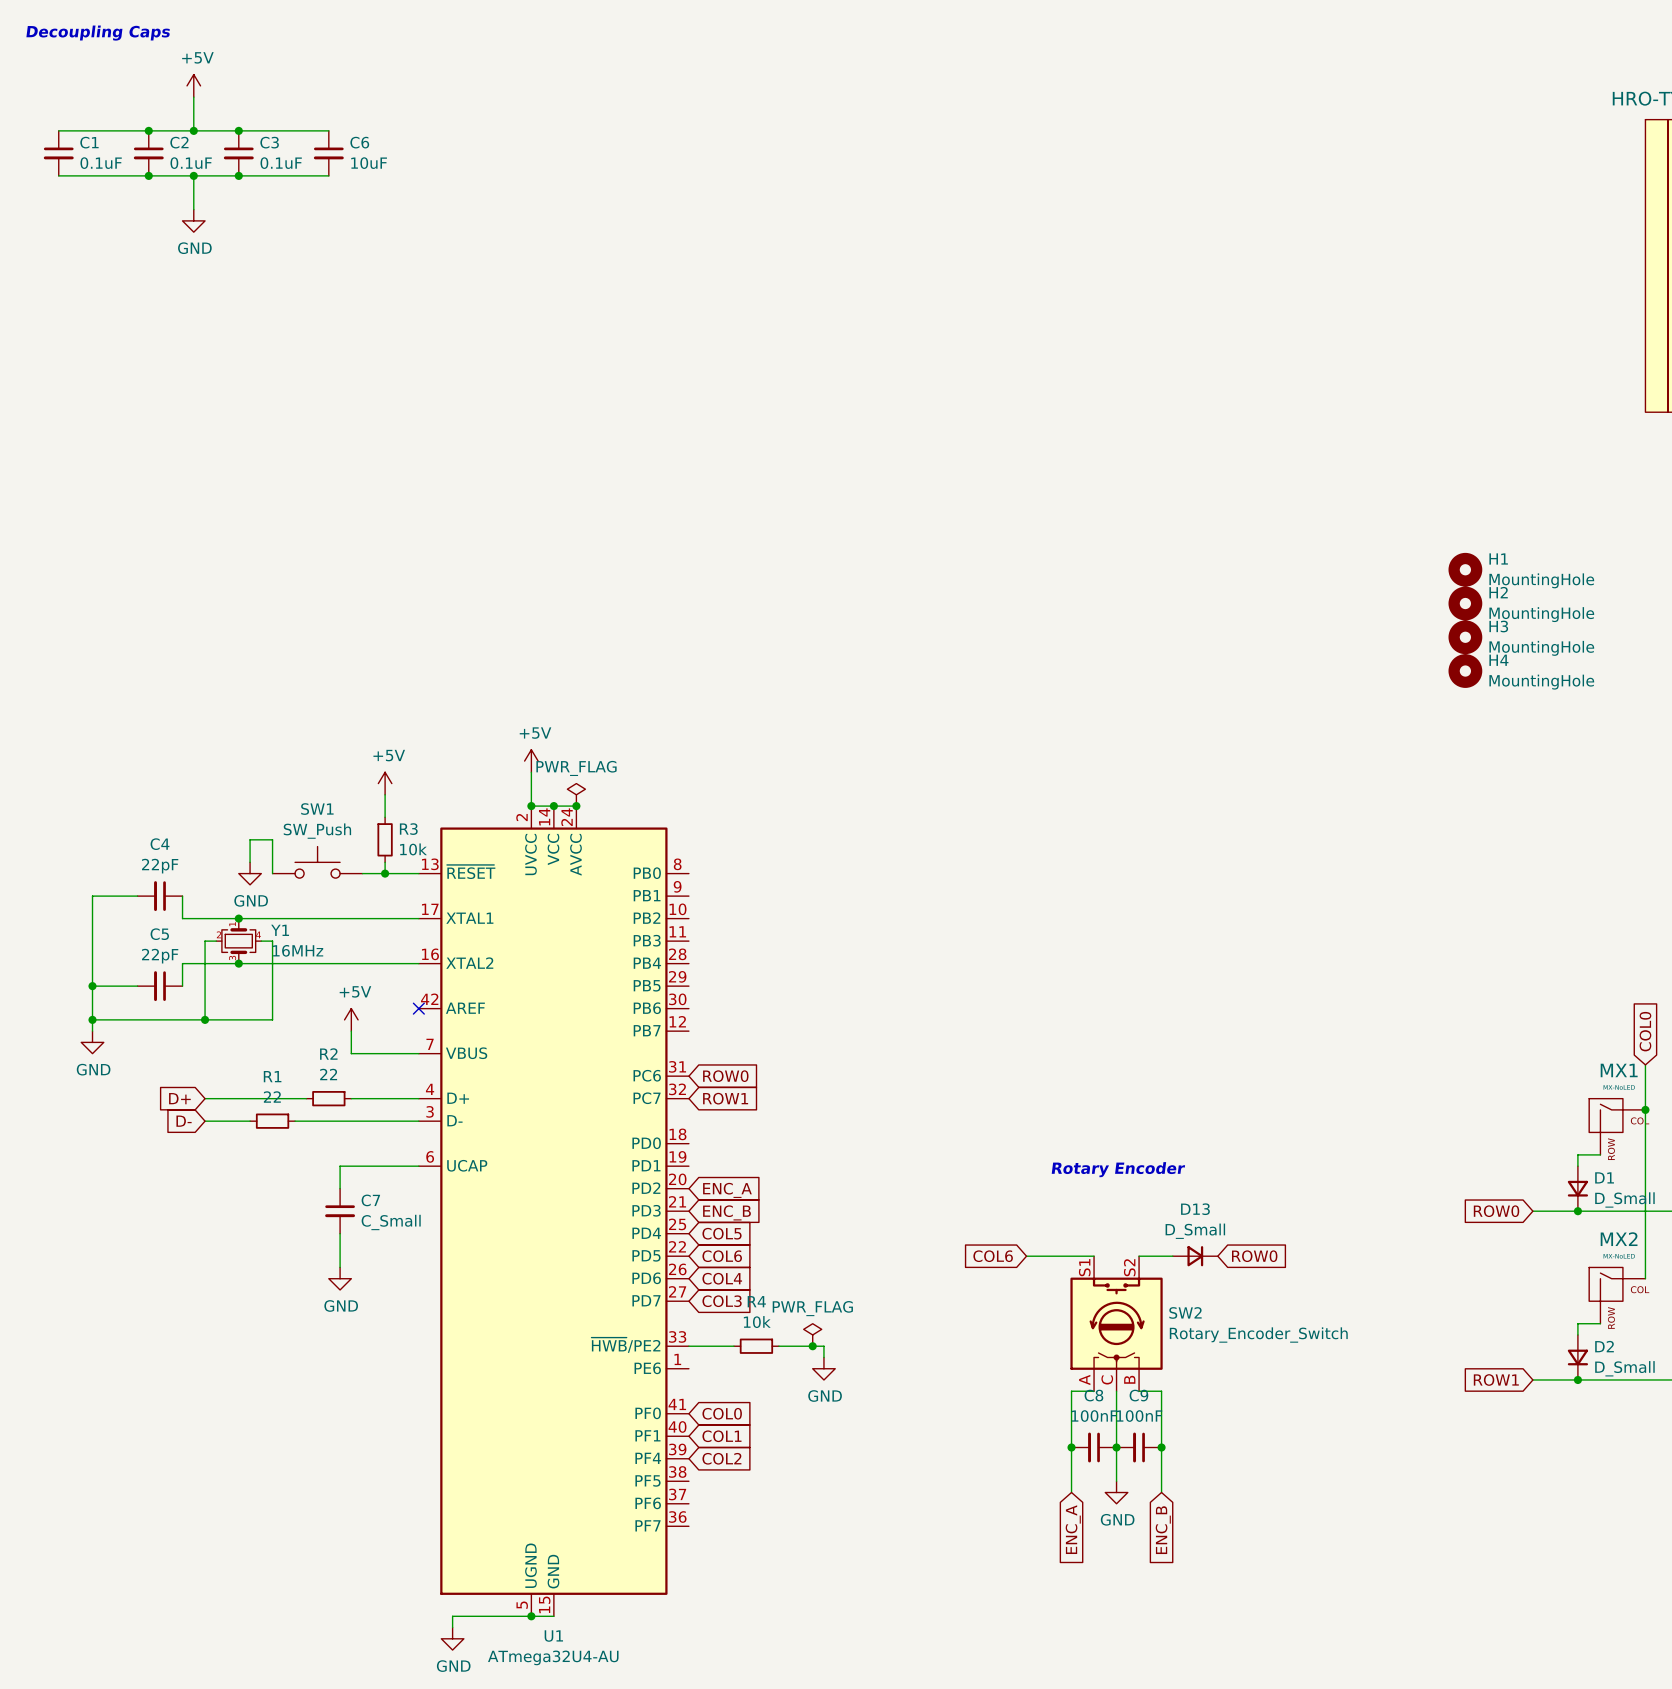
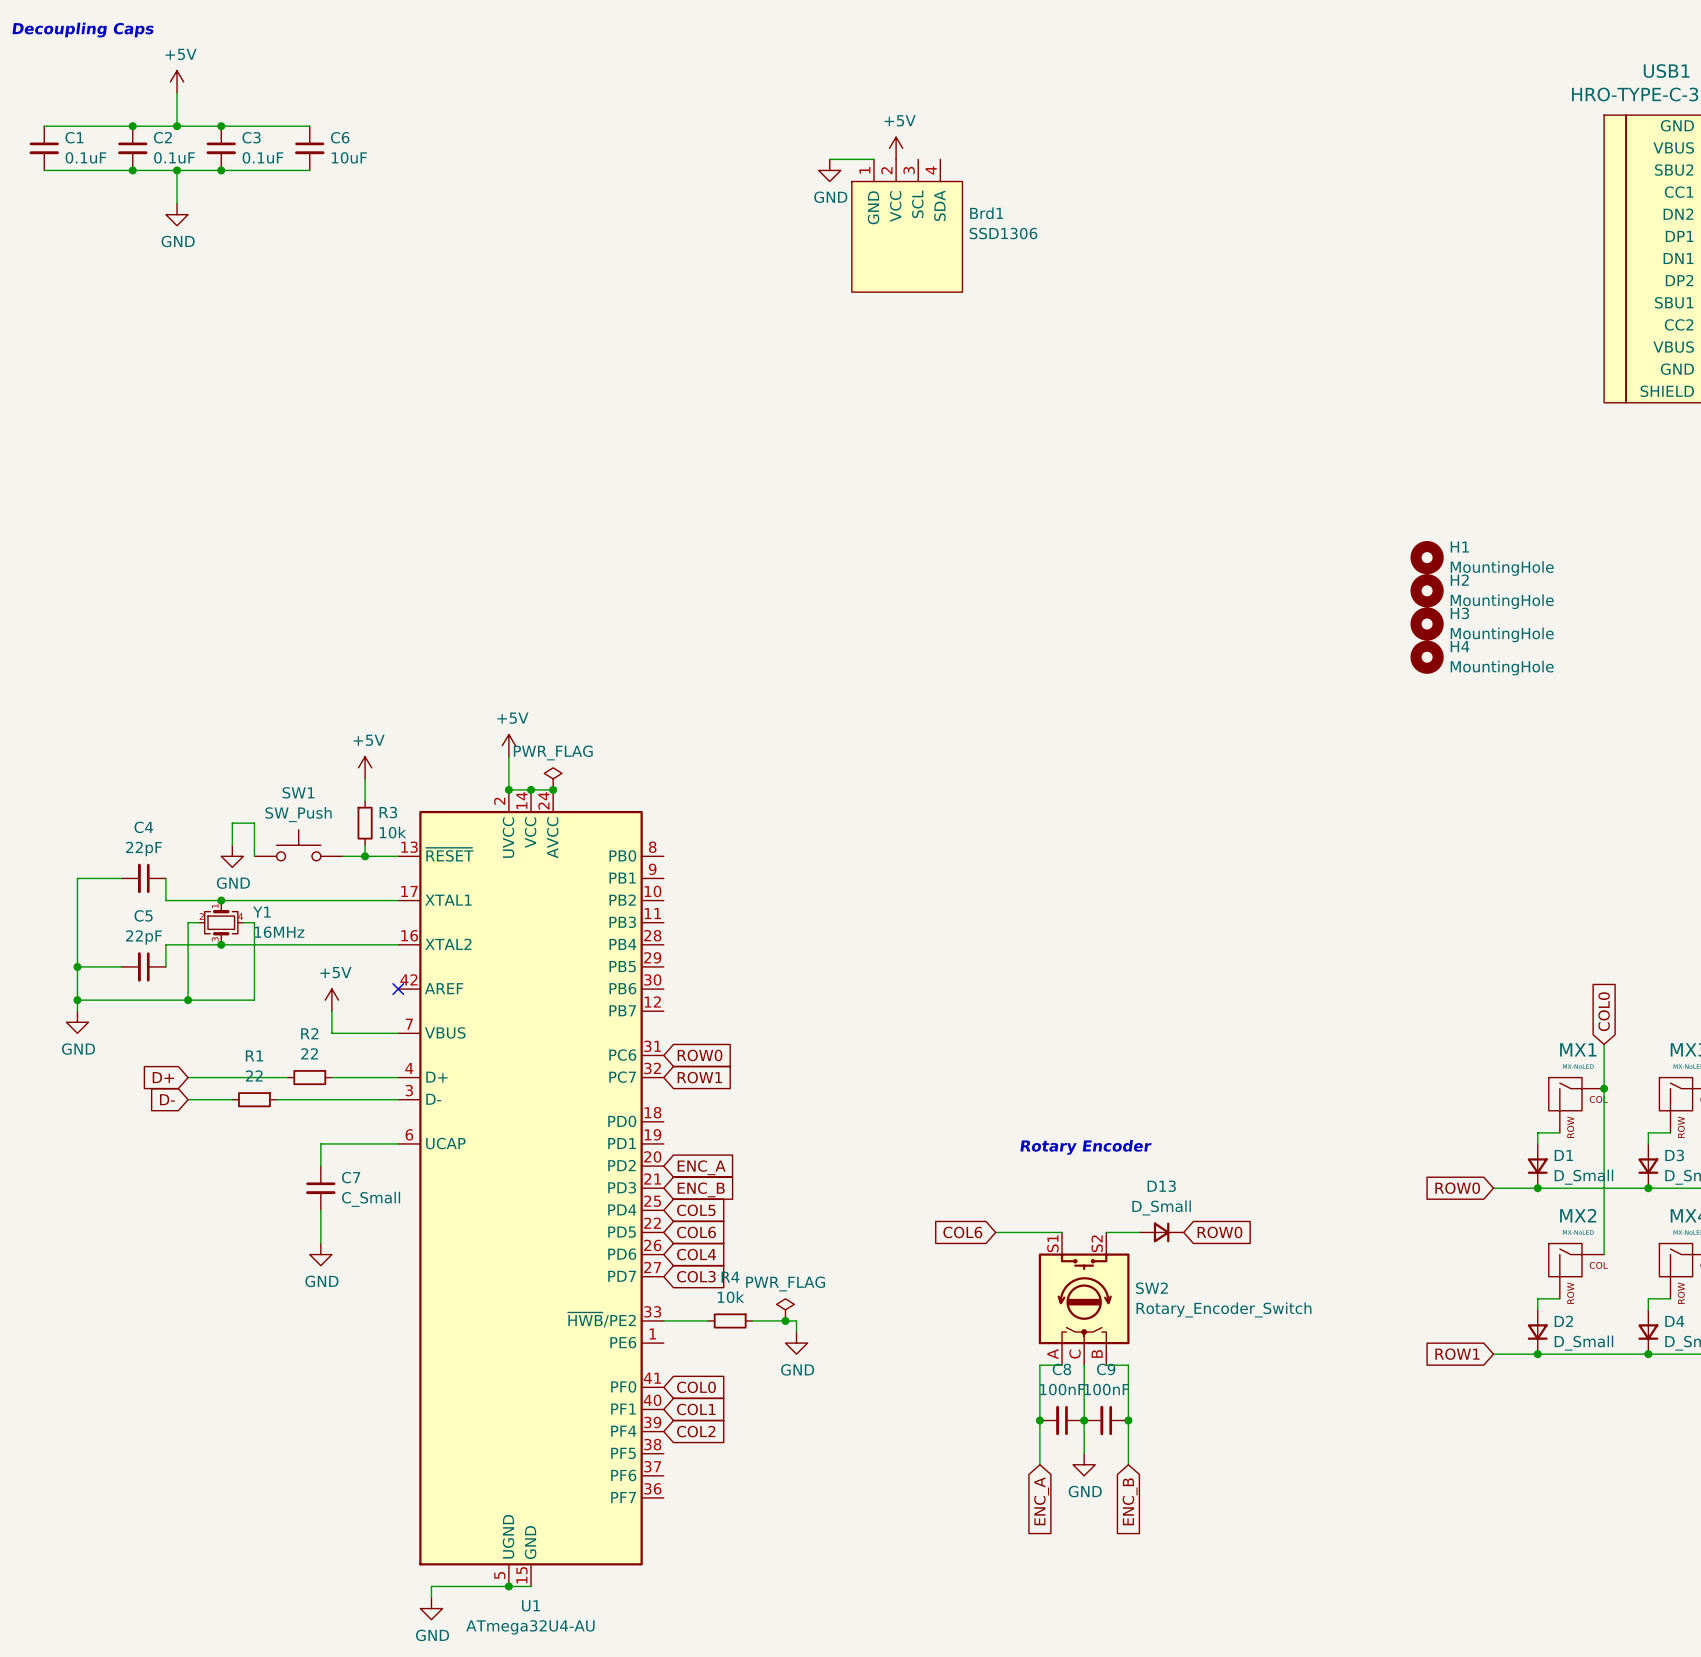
power symbol: none -> +5V (896, 148)
wire: none -> (829, 159) (873, 159)
power symbol: none -> GND (829, 170)
Brd1: none -> SSD1306 (907, 225)

